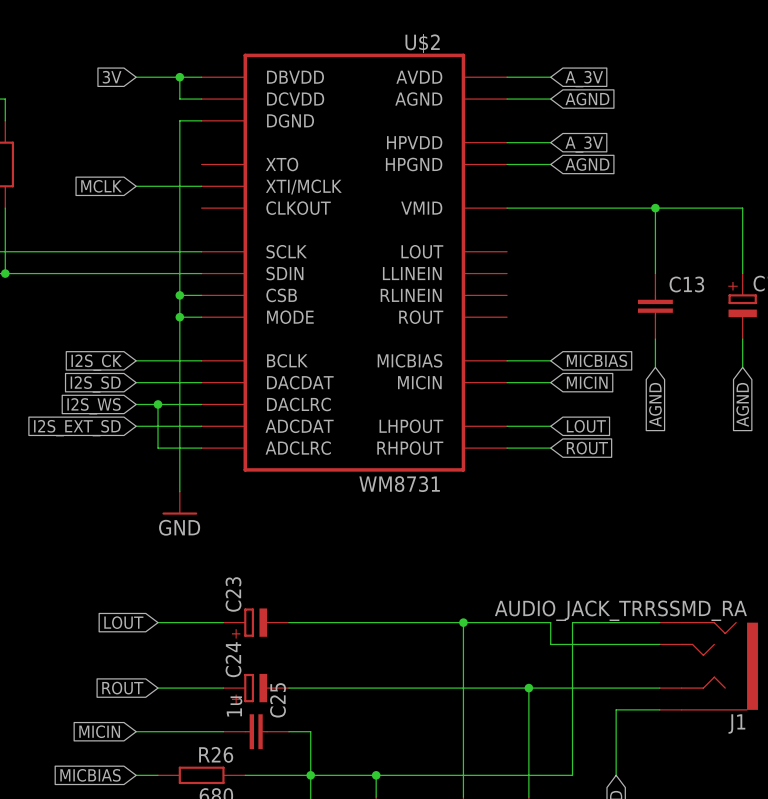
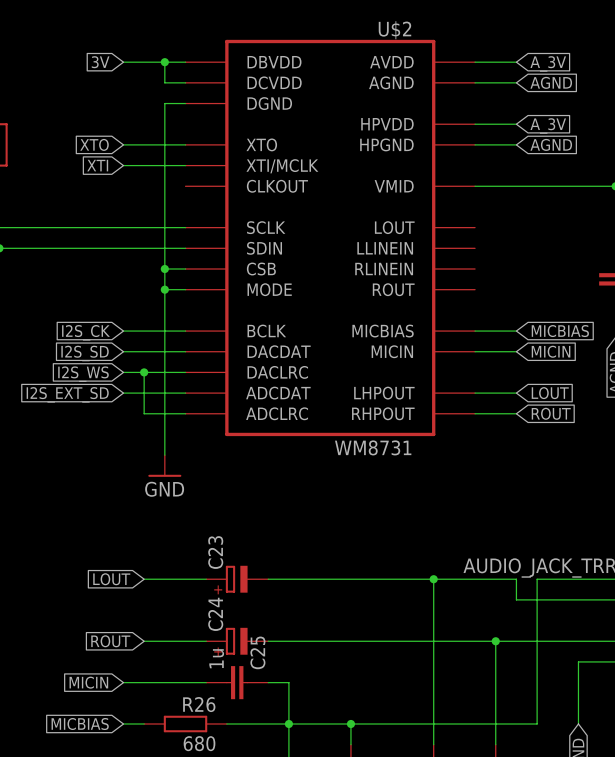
global label: none -> XTO (94, 144)
wire: none -> (123, 144) (185, 144)
global label: MCLK (101, 186) -> XTI (97, 165)

